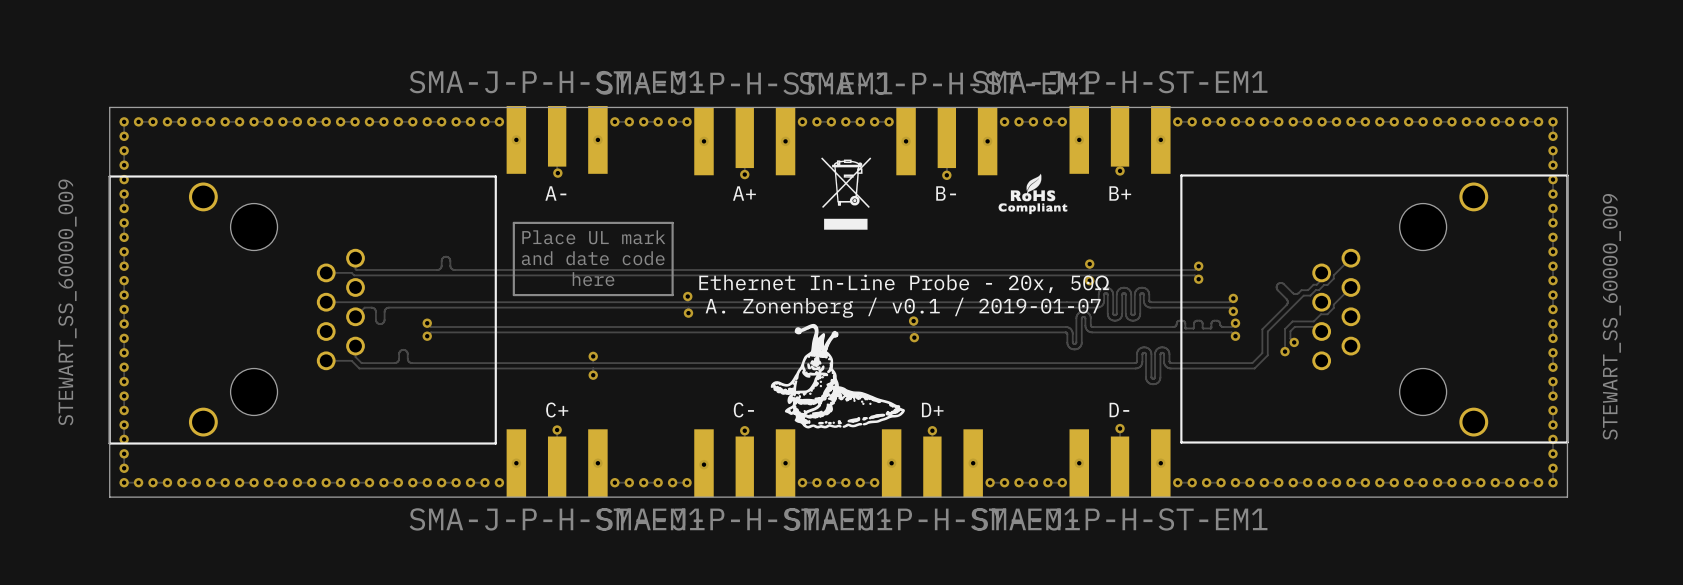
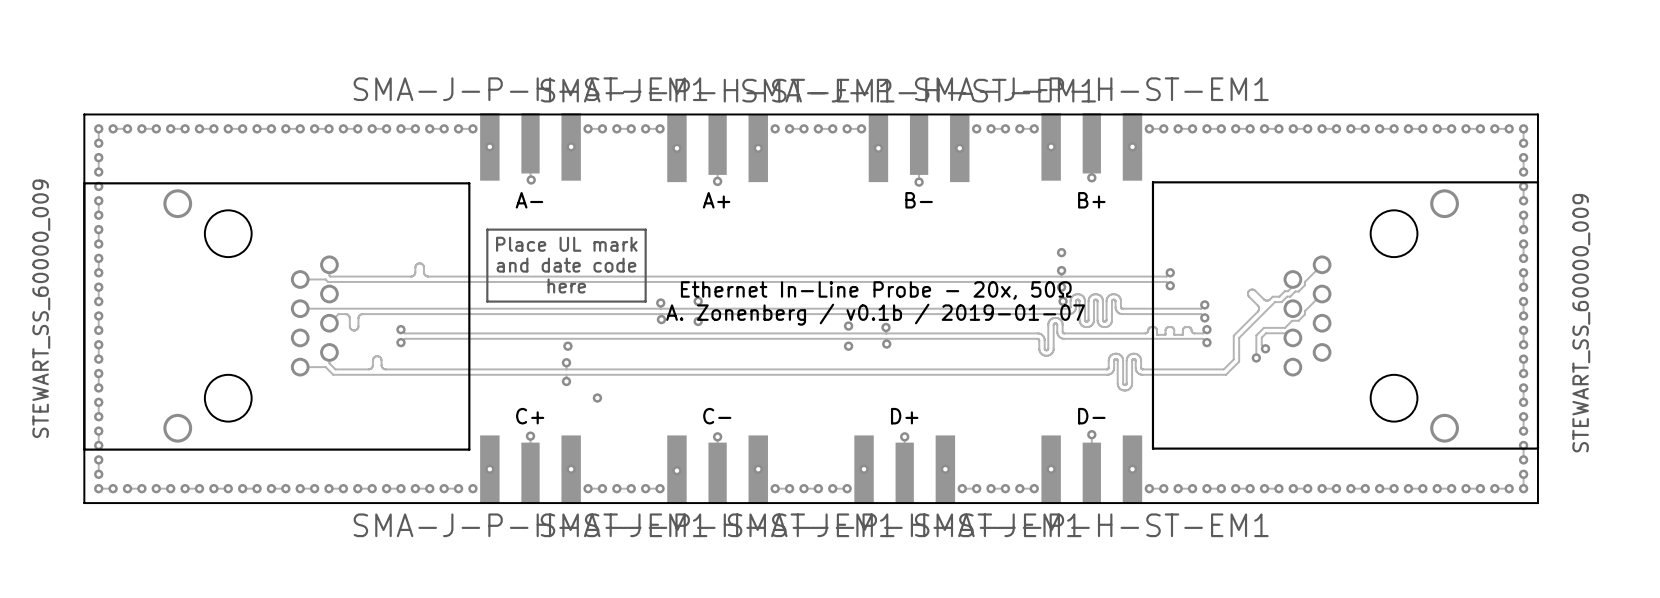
drawing: [821, 157, 872, 230] -> none
drawing: [998, 173, 1068, 215] -> none
via: none -> (1061, 252)
via: none -> (698, 301)
via: none -> (1063, 301)
text: A. Zonenberg / v0.1 / 2019-01-07 (903, 307) -> A. Zonenberg / v0.1b / 2019-01-07 (875, 314)
via: none -> (698, 321)
via: none -> (848, 326)
drawing: [770, 323, 905, 429] -> none
via: none -> (567, 346)
via: none -> (848, 346)
via: none -> (597, 398)

